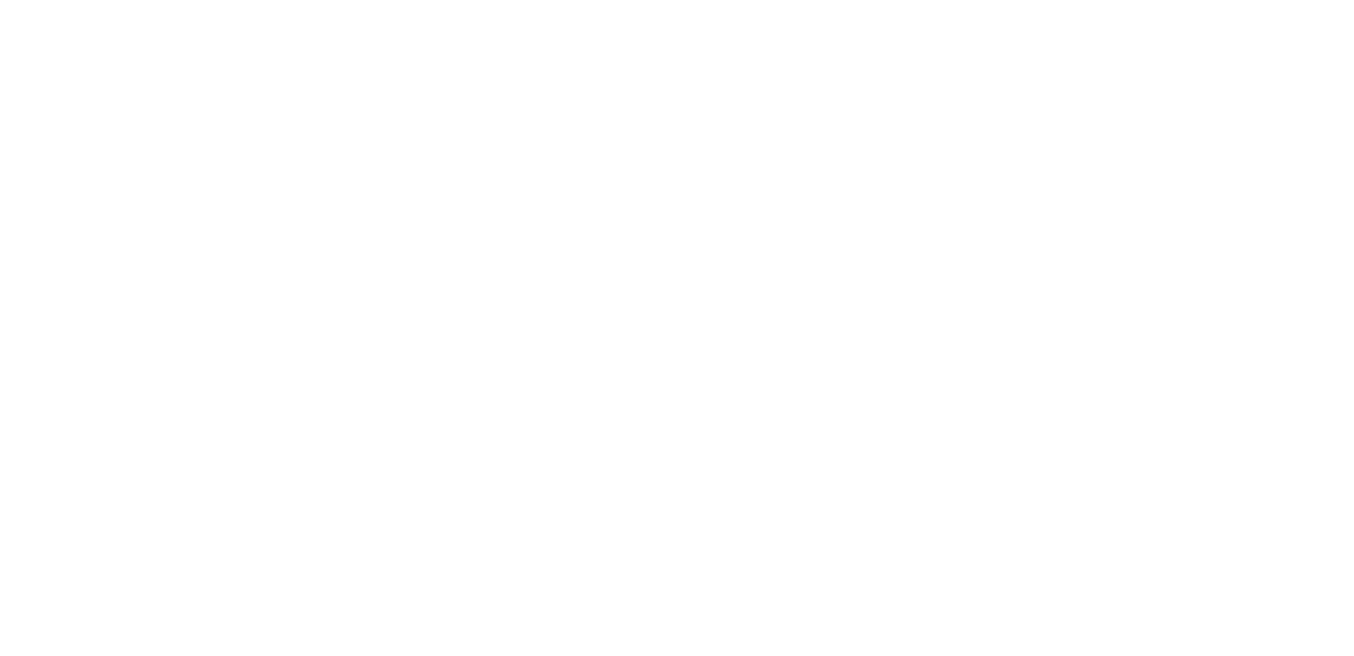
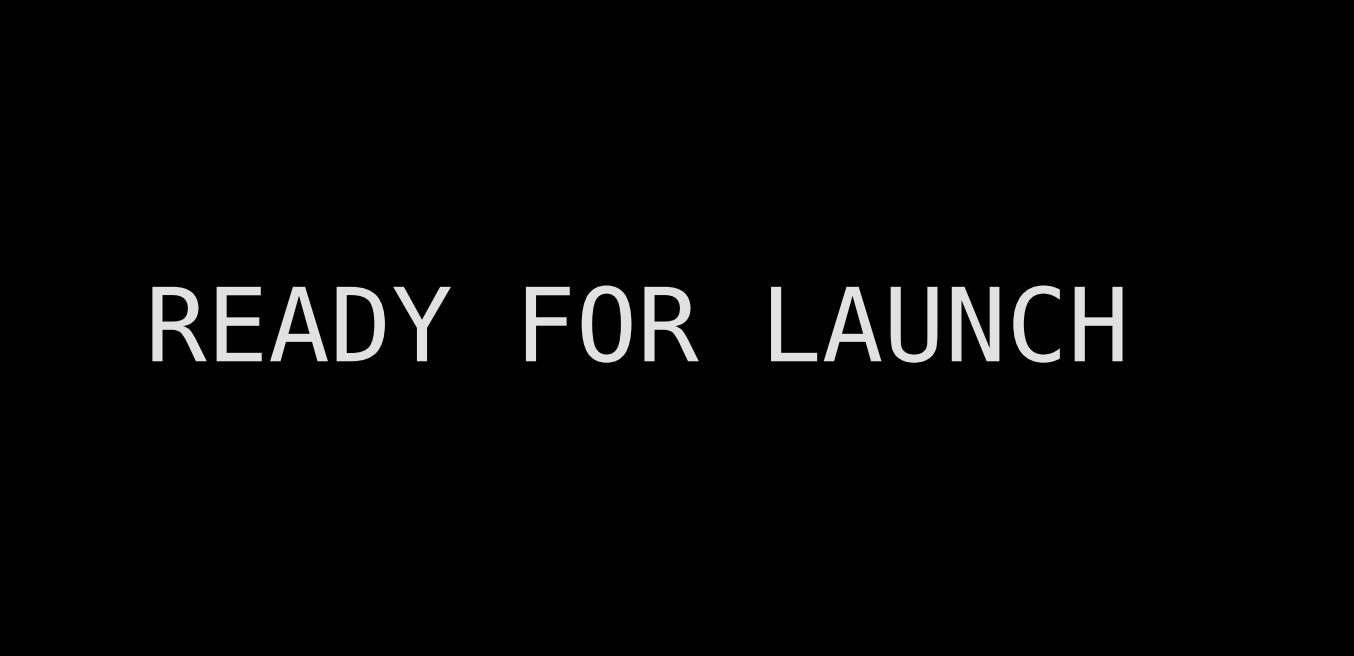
text: none -> READY FOR LAUNCH (637, 324)

